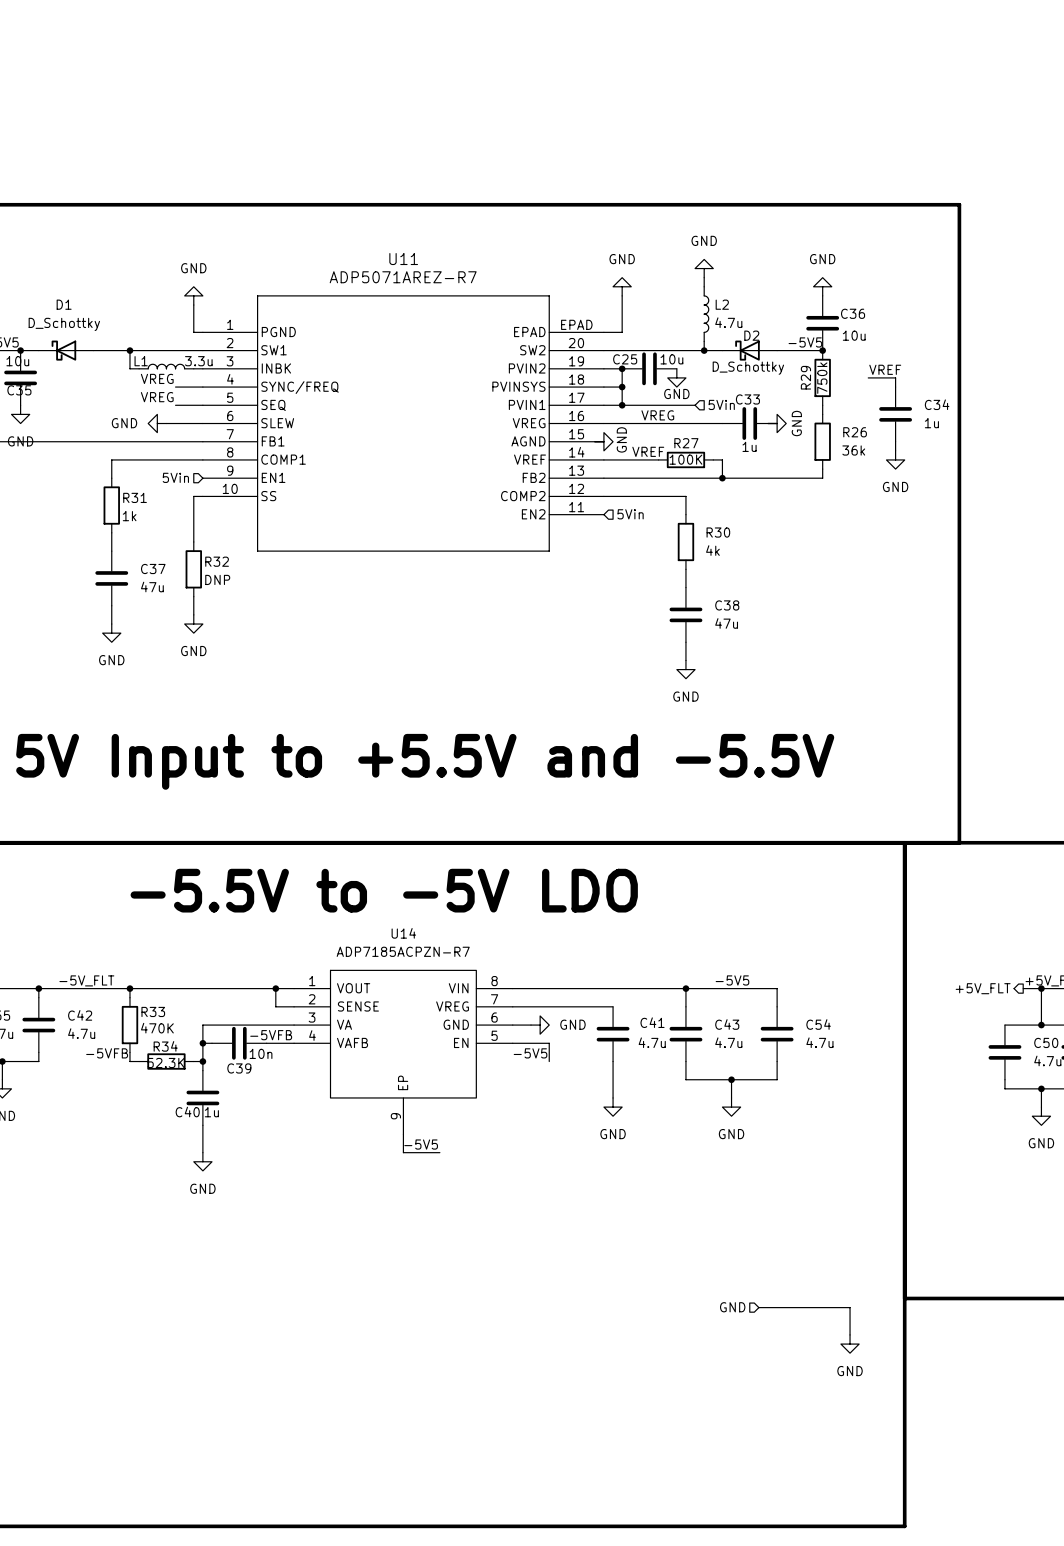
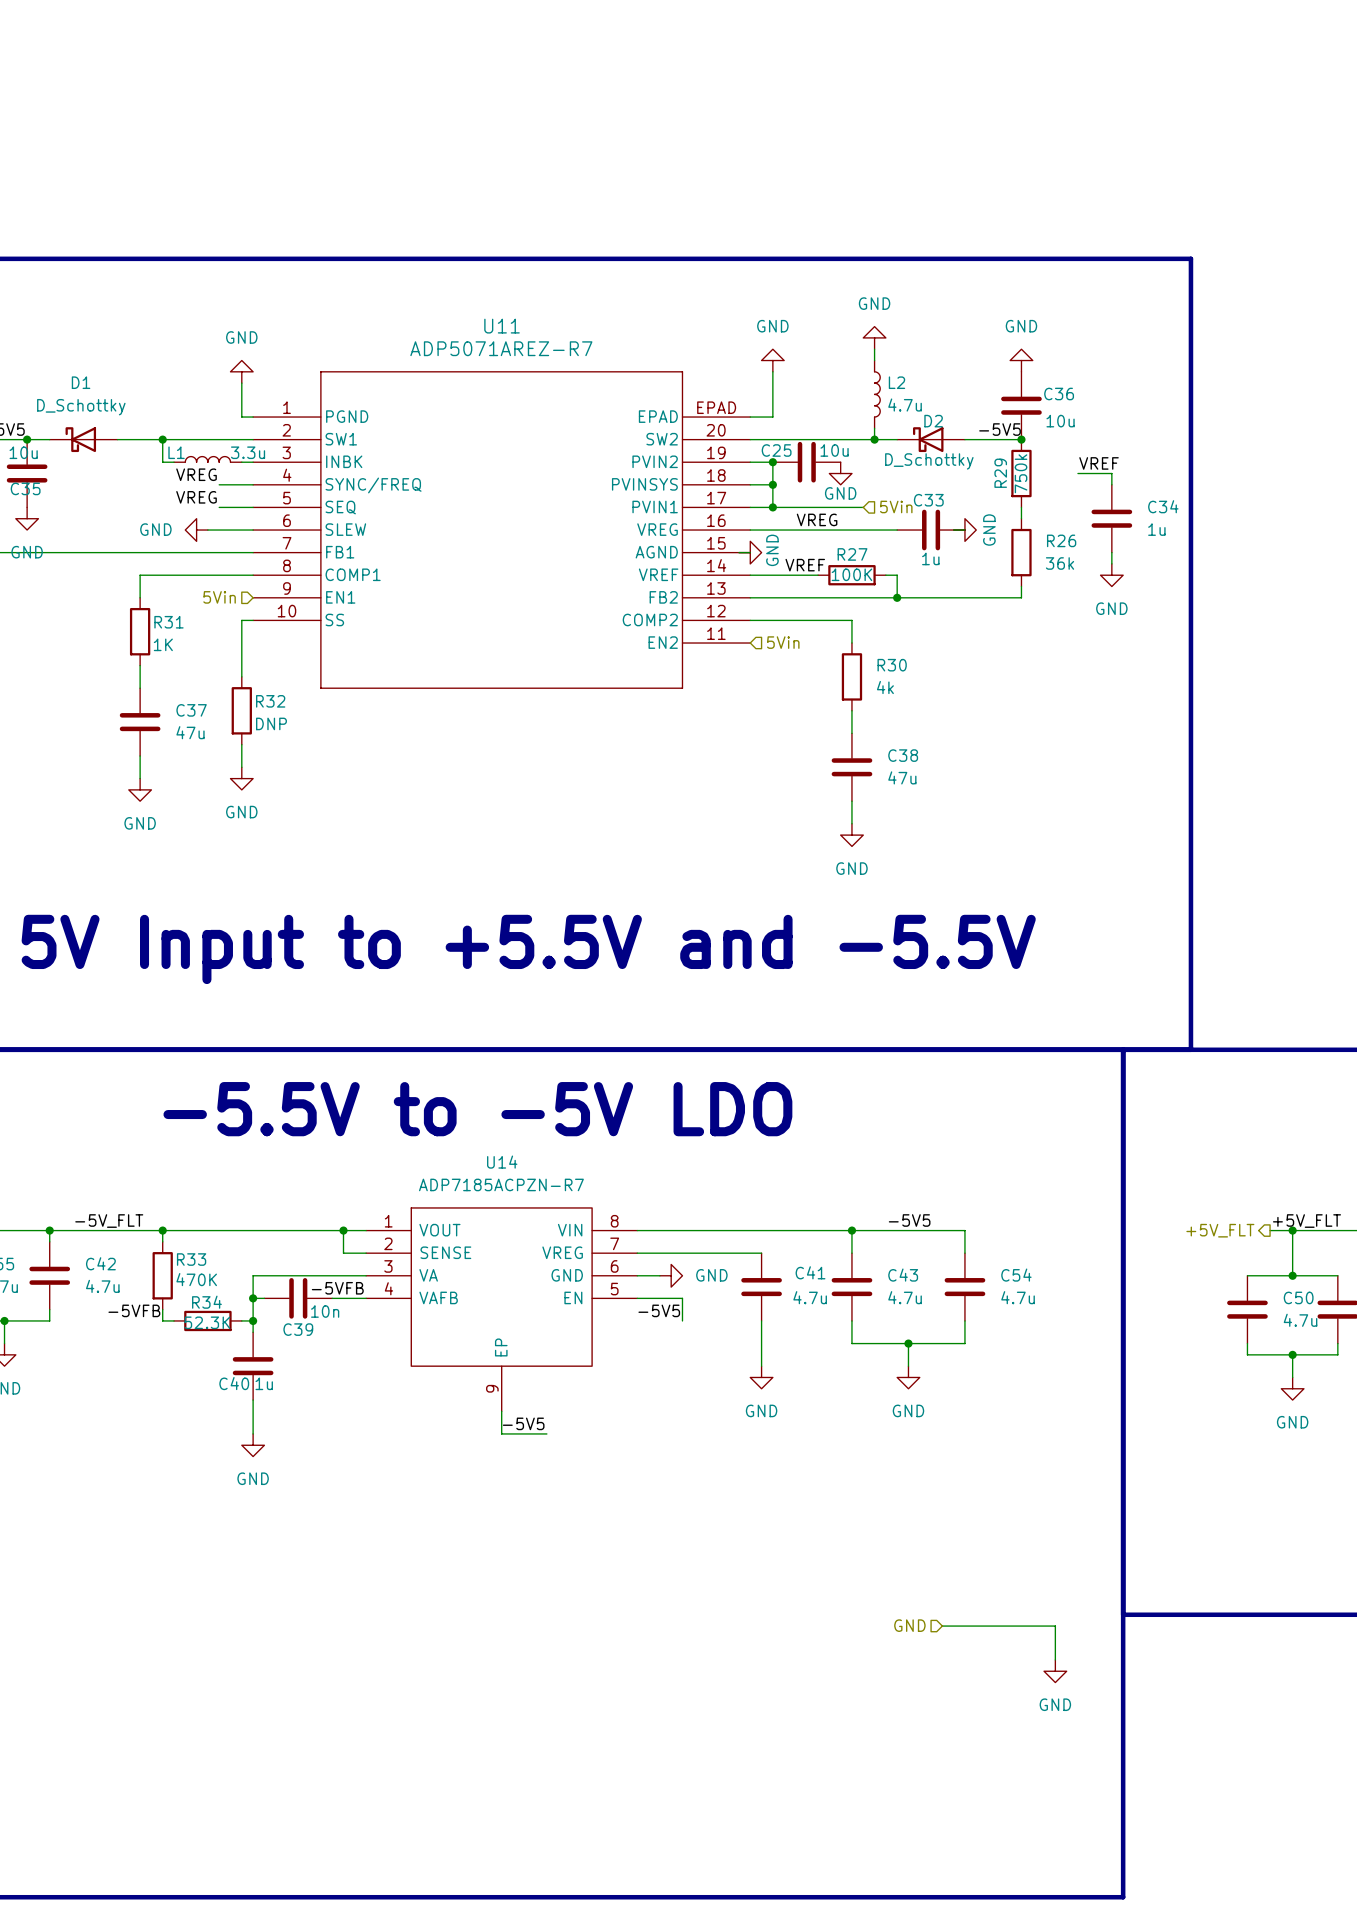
R31 value: 1k (129, 516) -> 1K (163, 644)

